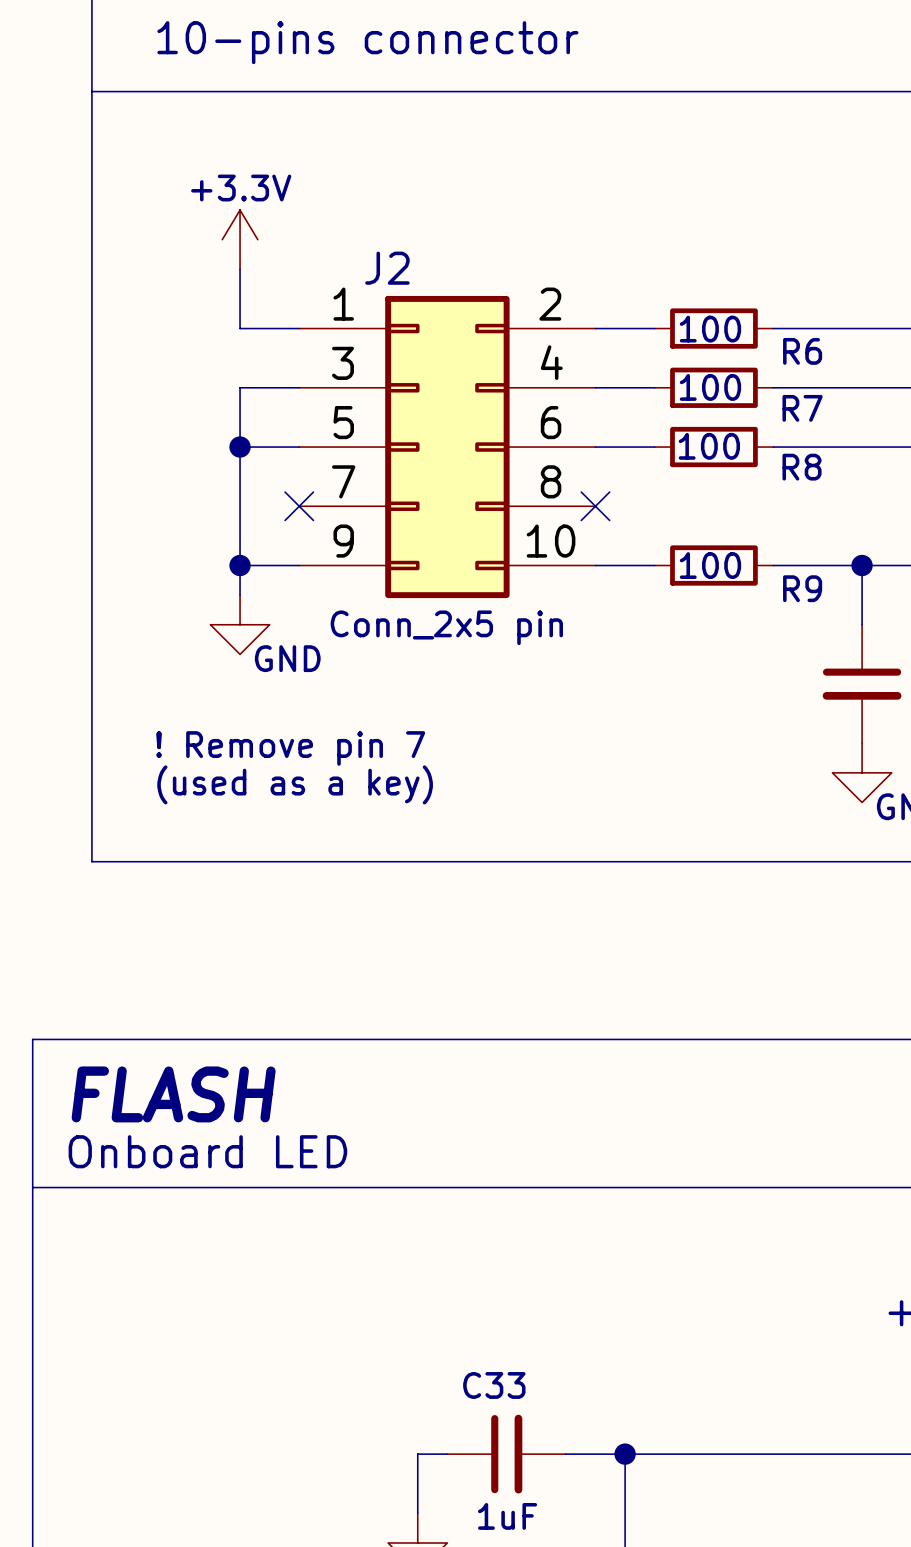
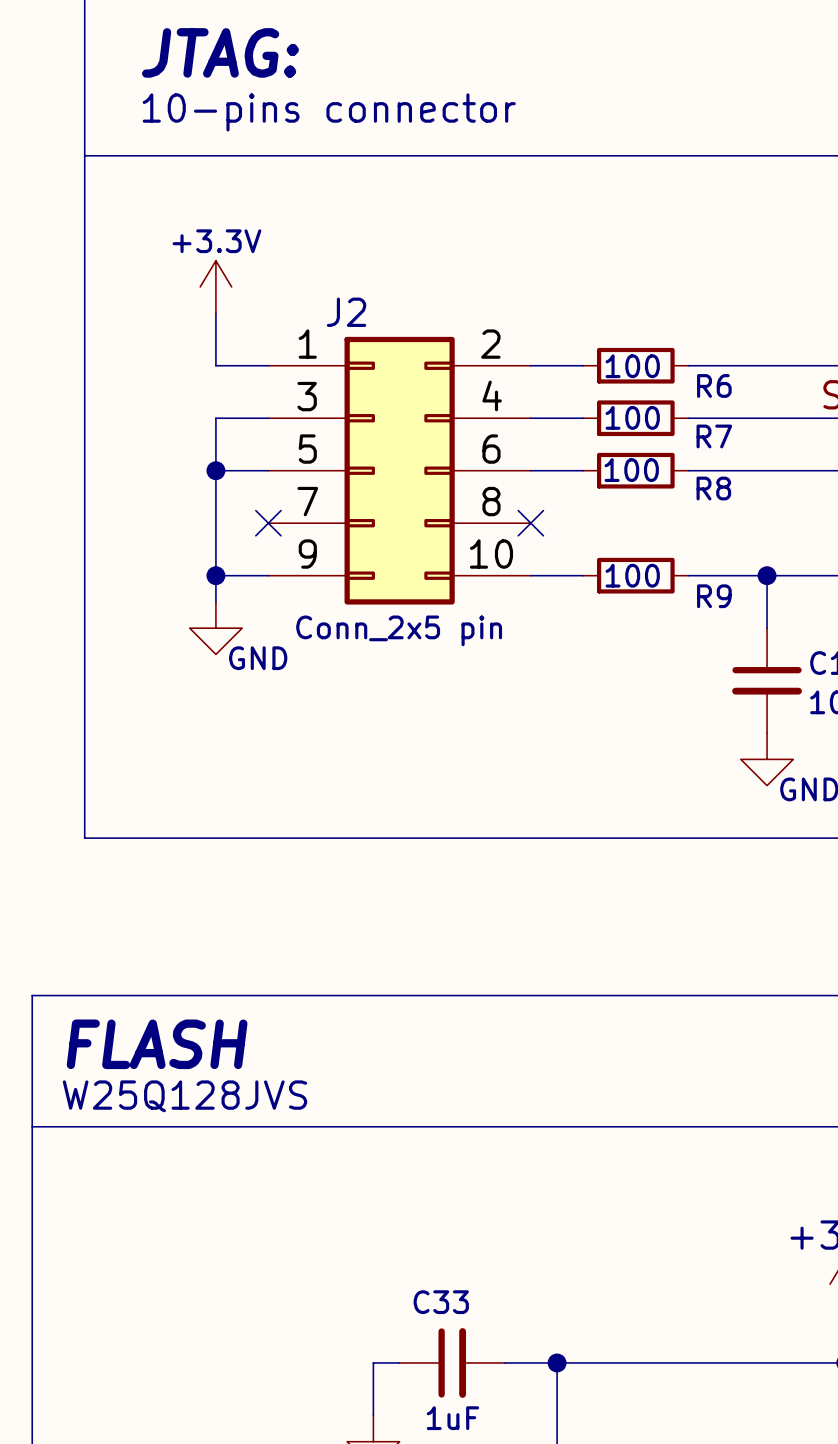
text: ! Remove pin 7 (290, 748) -> none
text: (used as a key) (295, 784) -> none
text: Onboard LED (207, 1151) -> W25Q128JVS (184, 1096)

